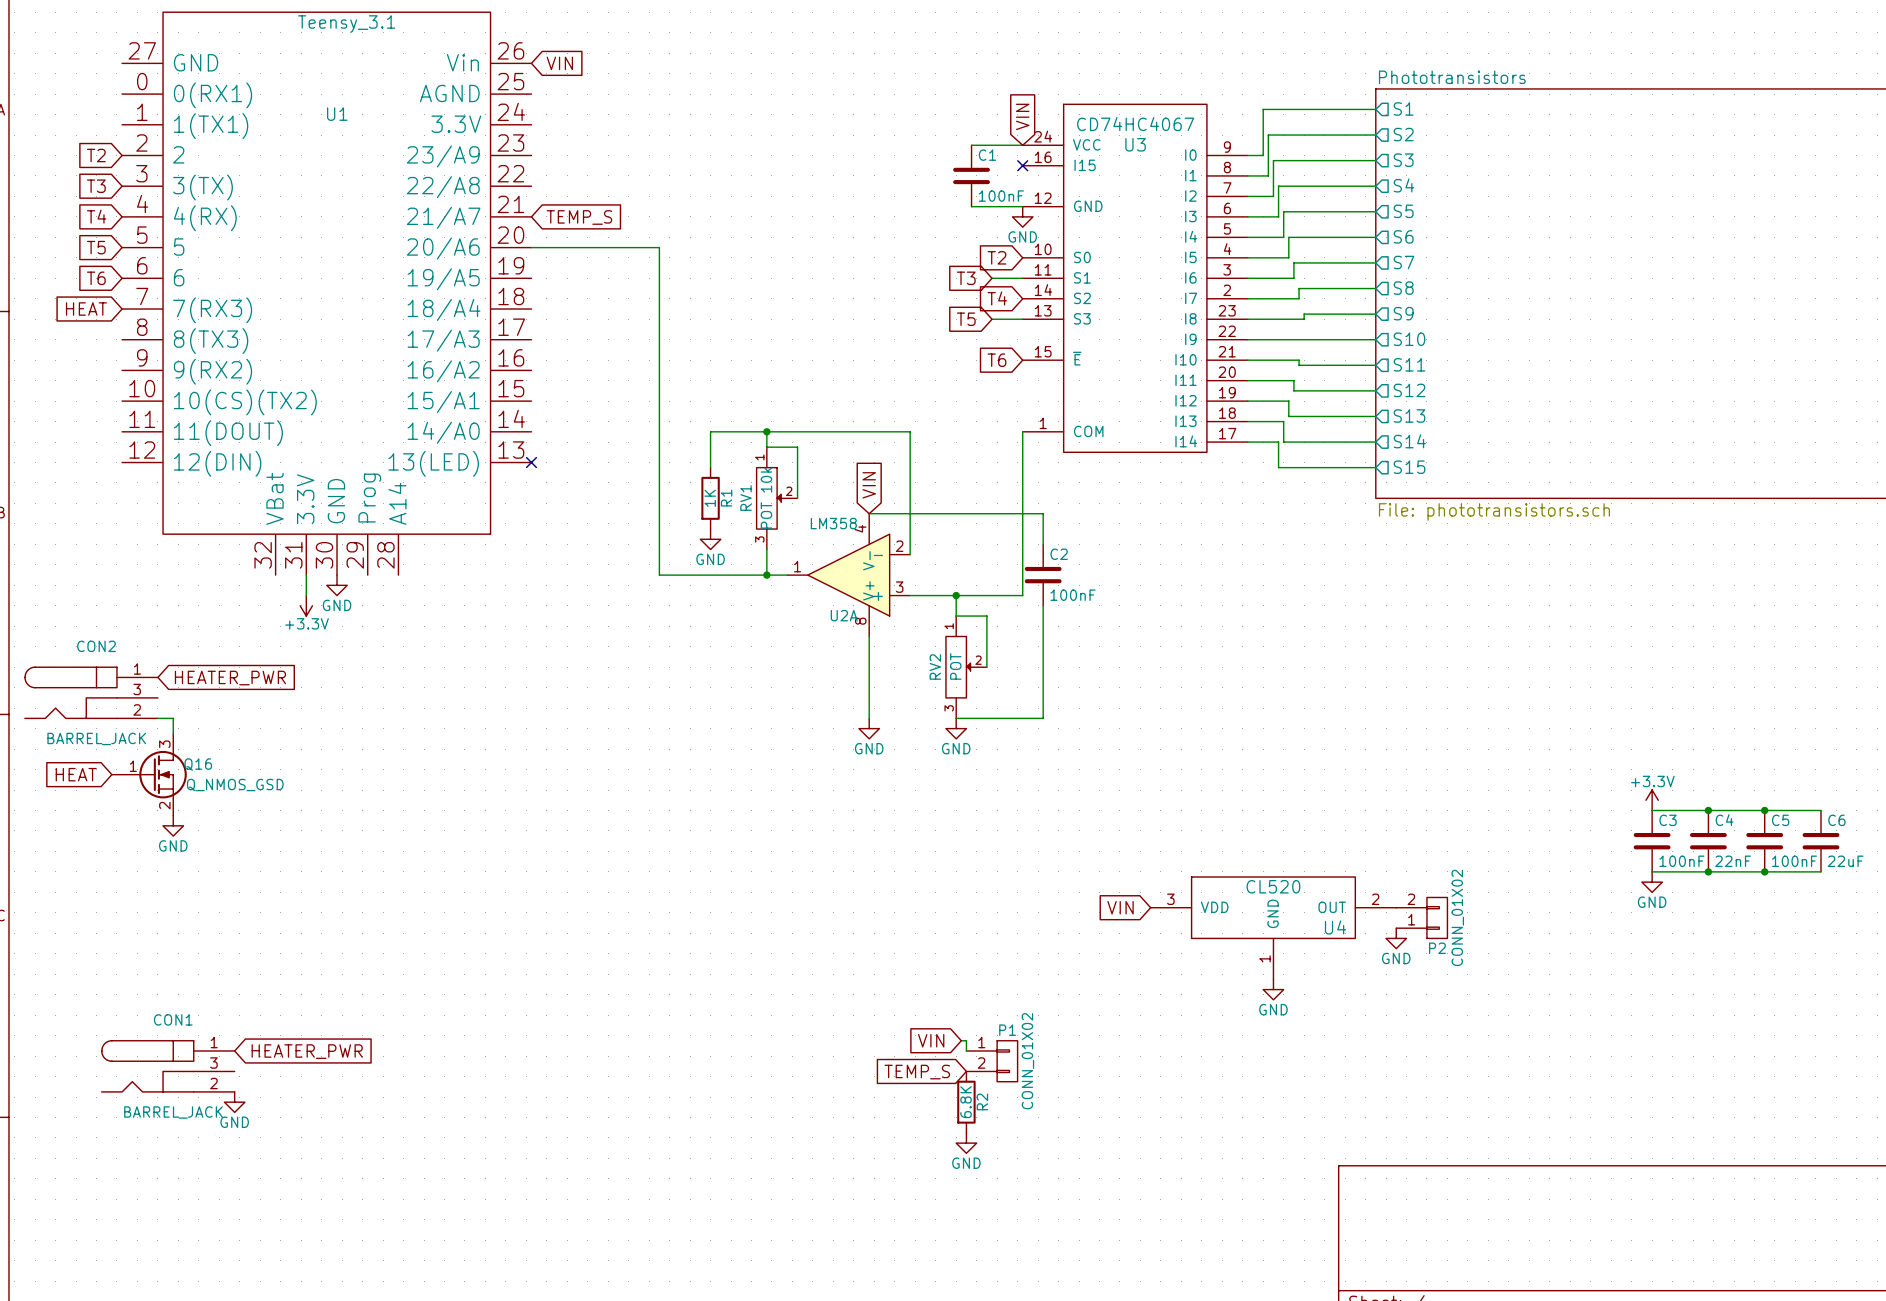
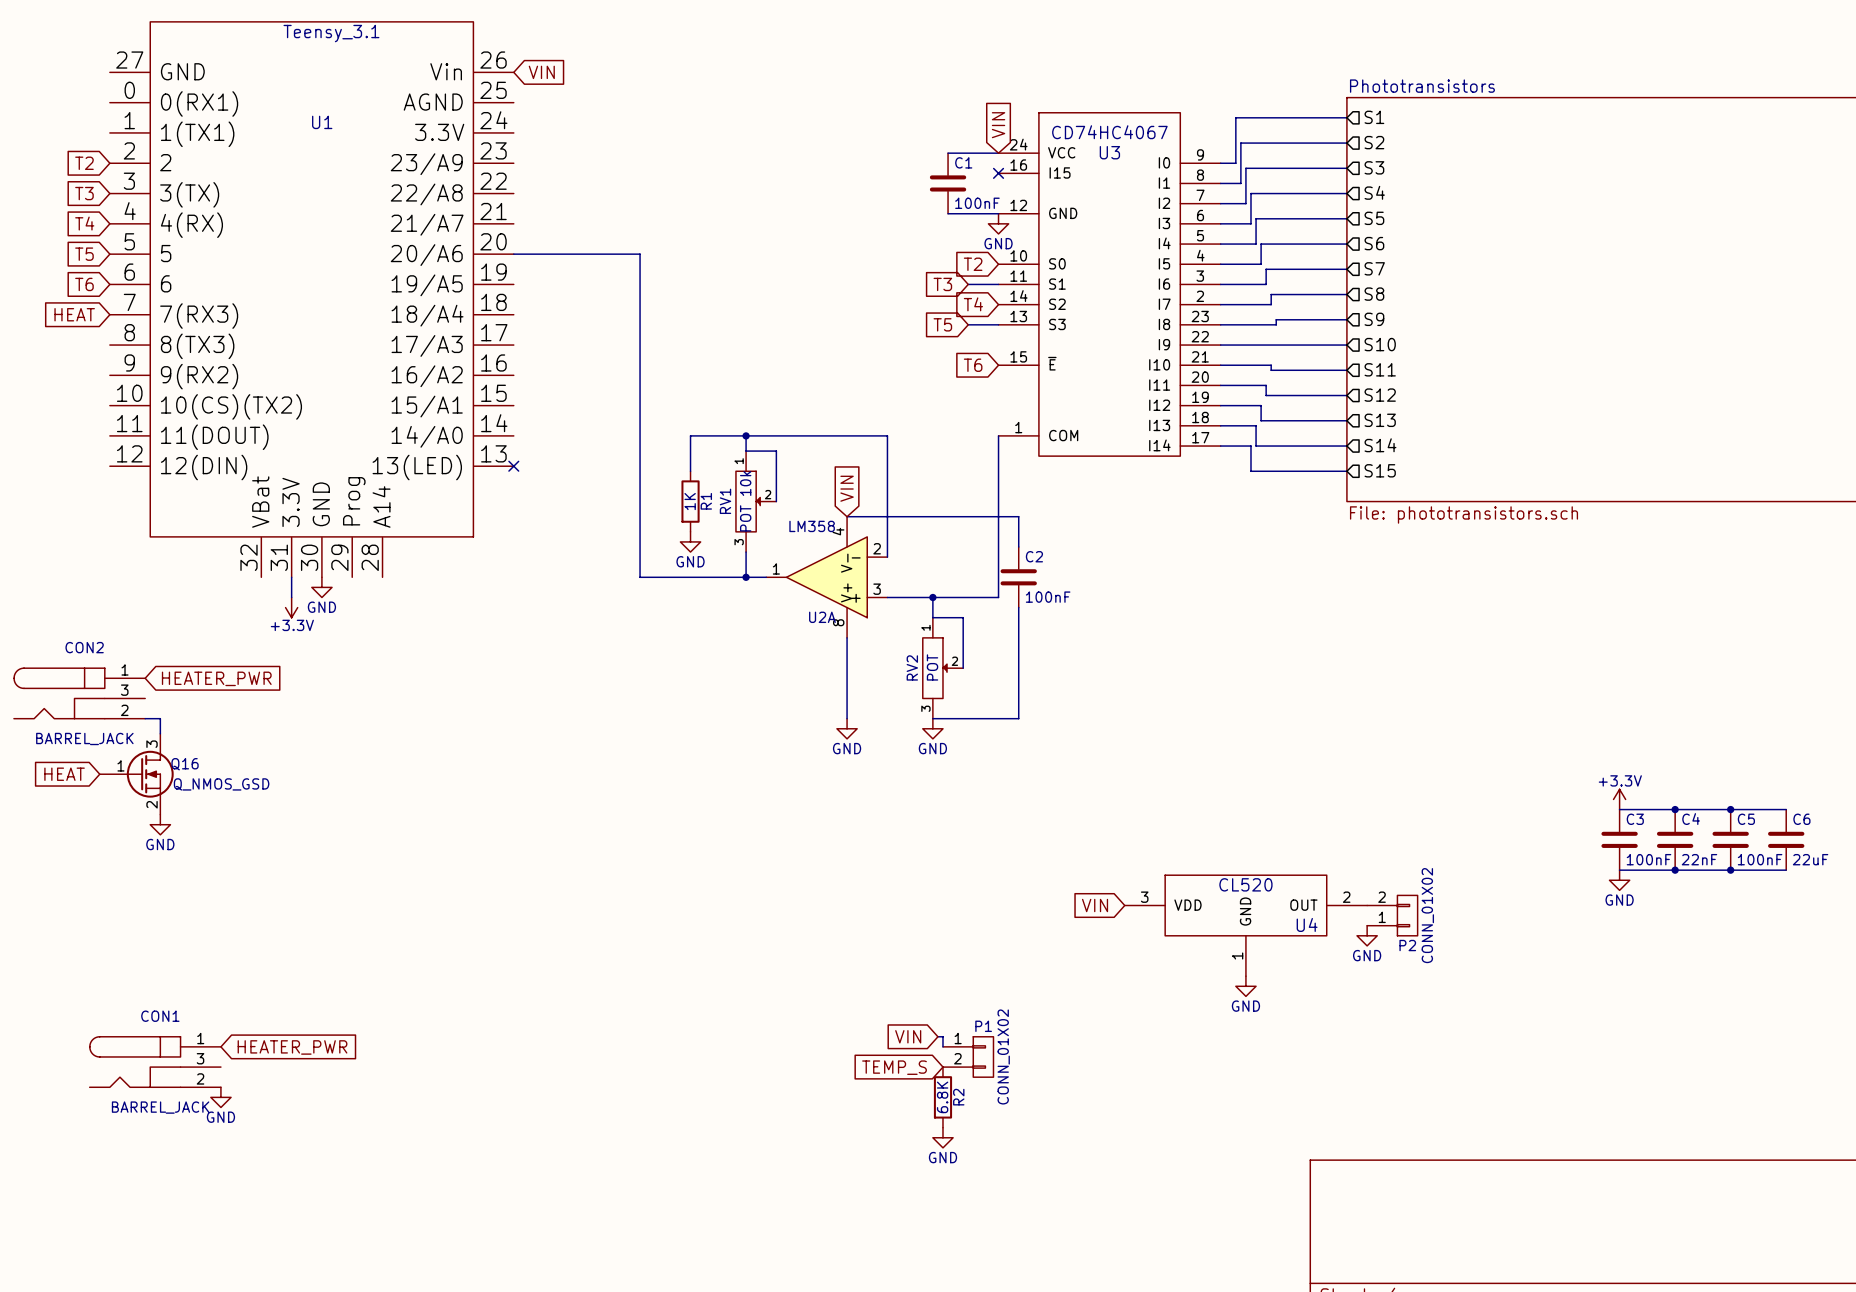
global label: TEMP_S (579, 217) -> none

